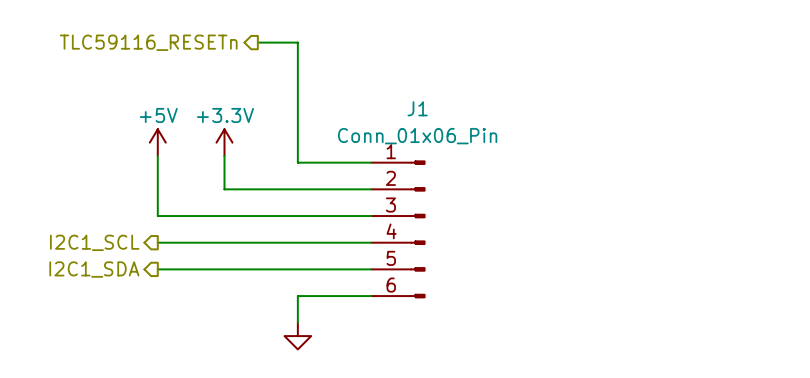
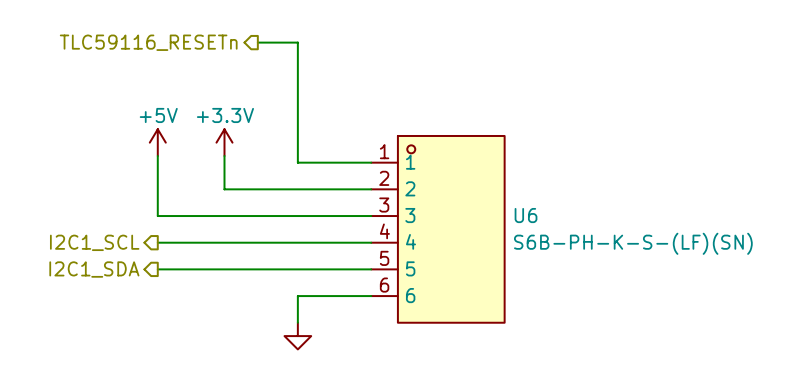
J1: Conn_01x06_Pin (398, 229) -> none
U6: none -> S6B-PH-K-S-(LF)(SN) (437, 229)

